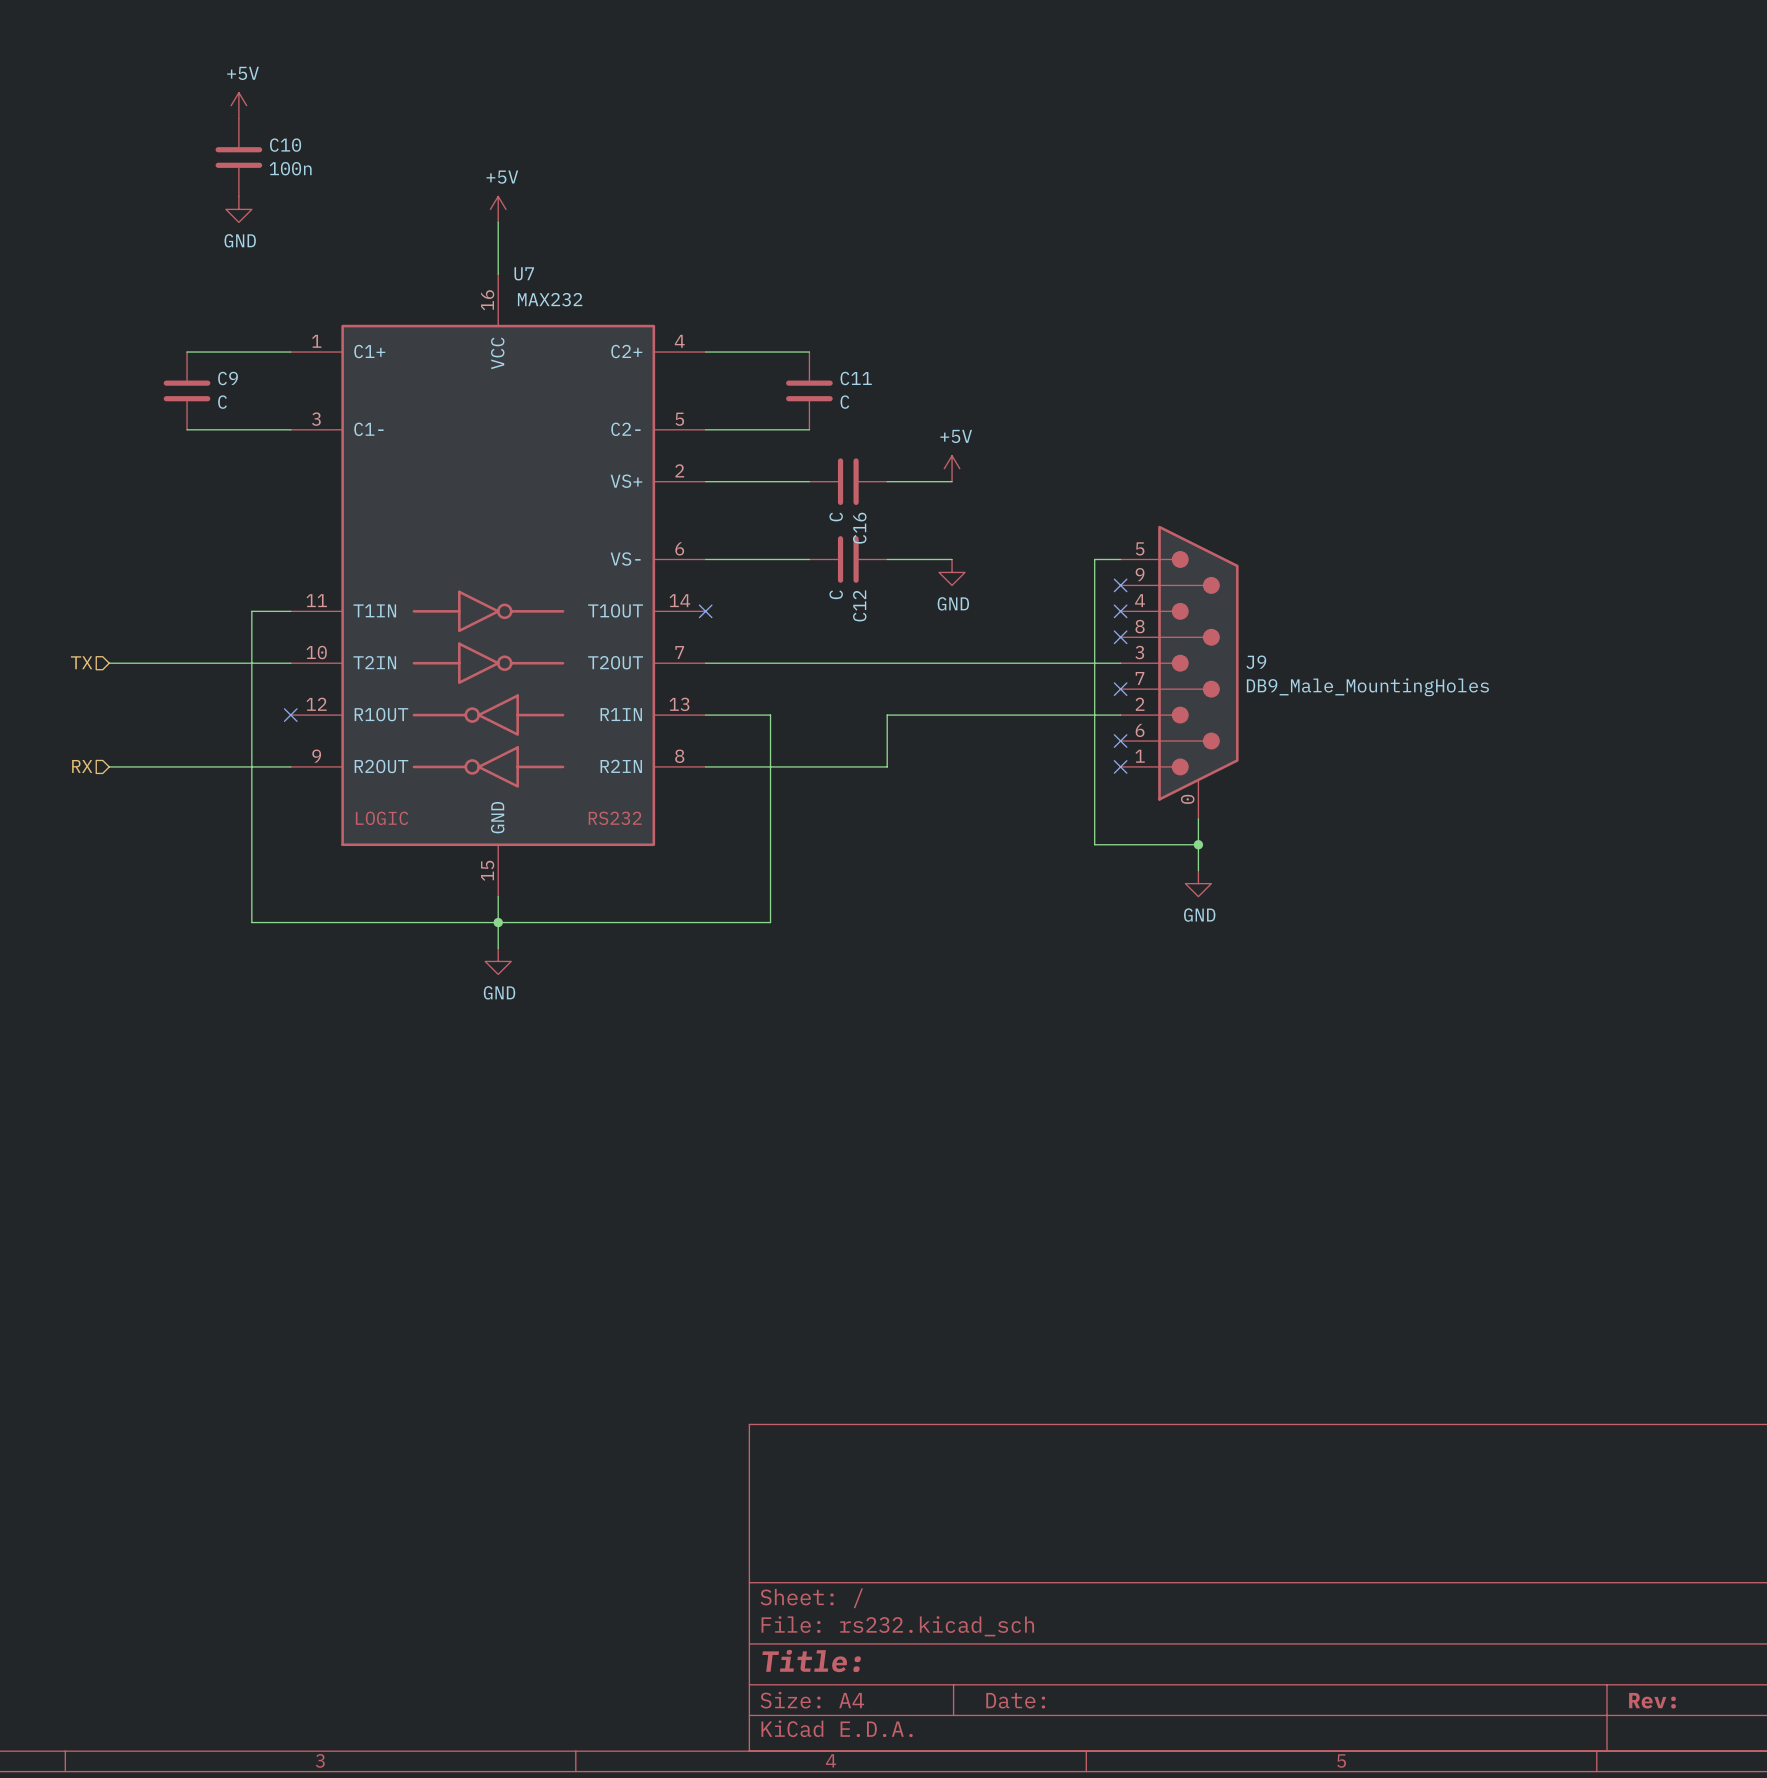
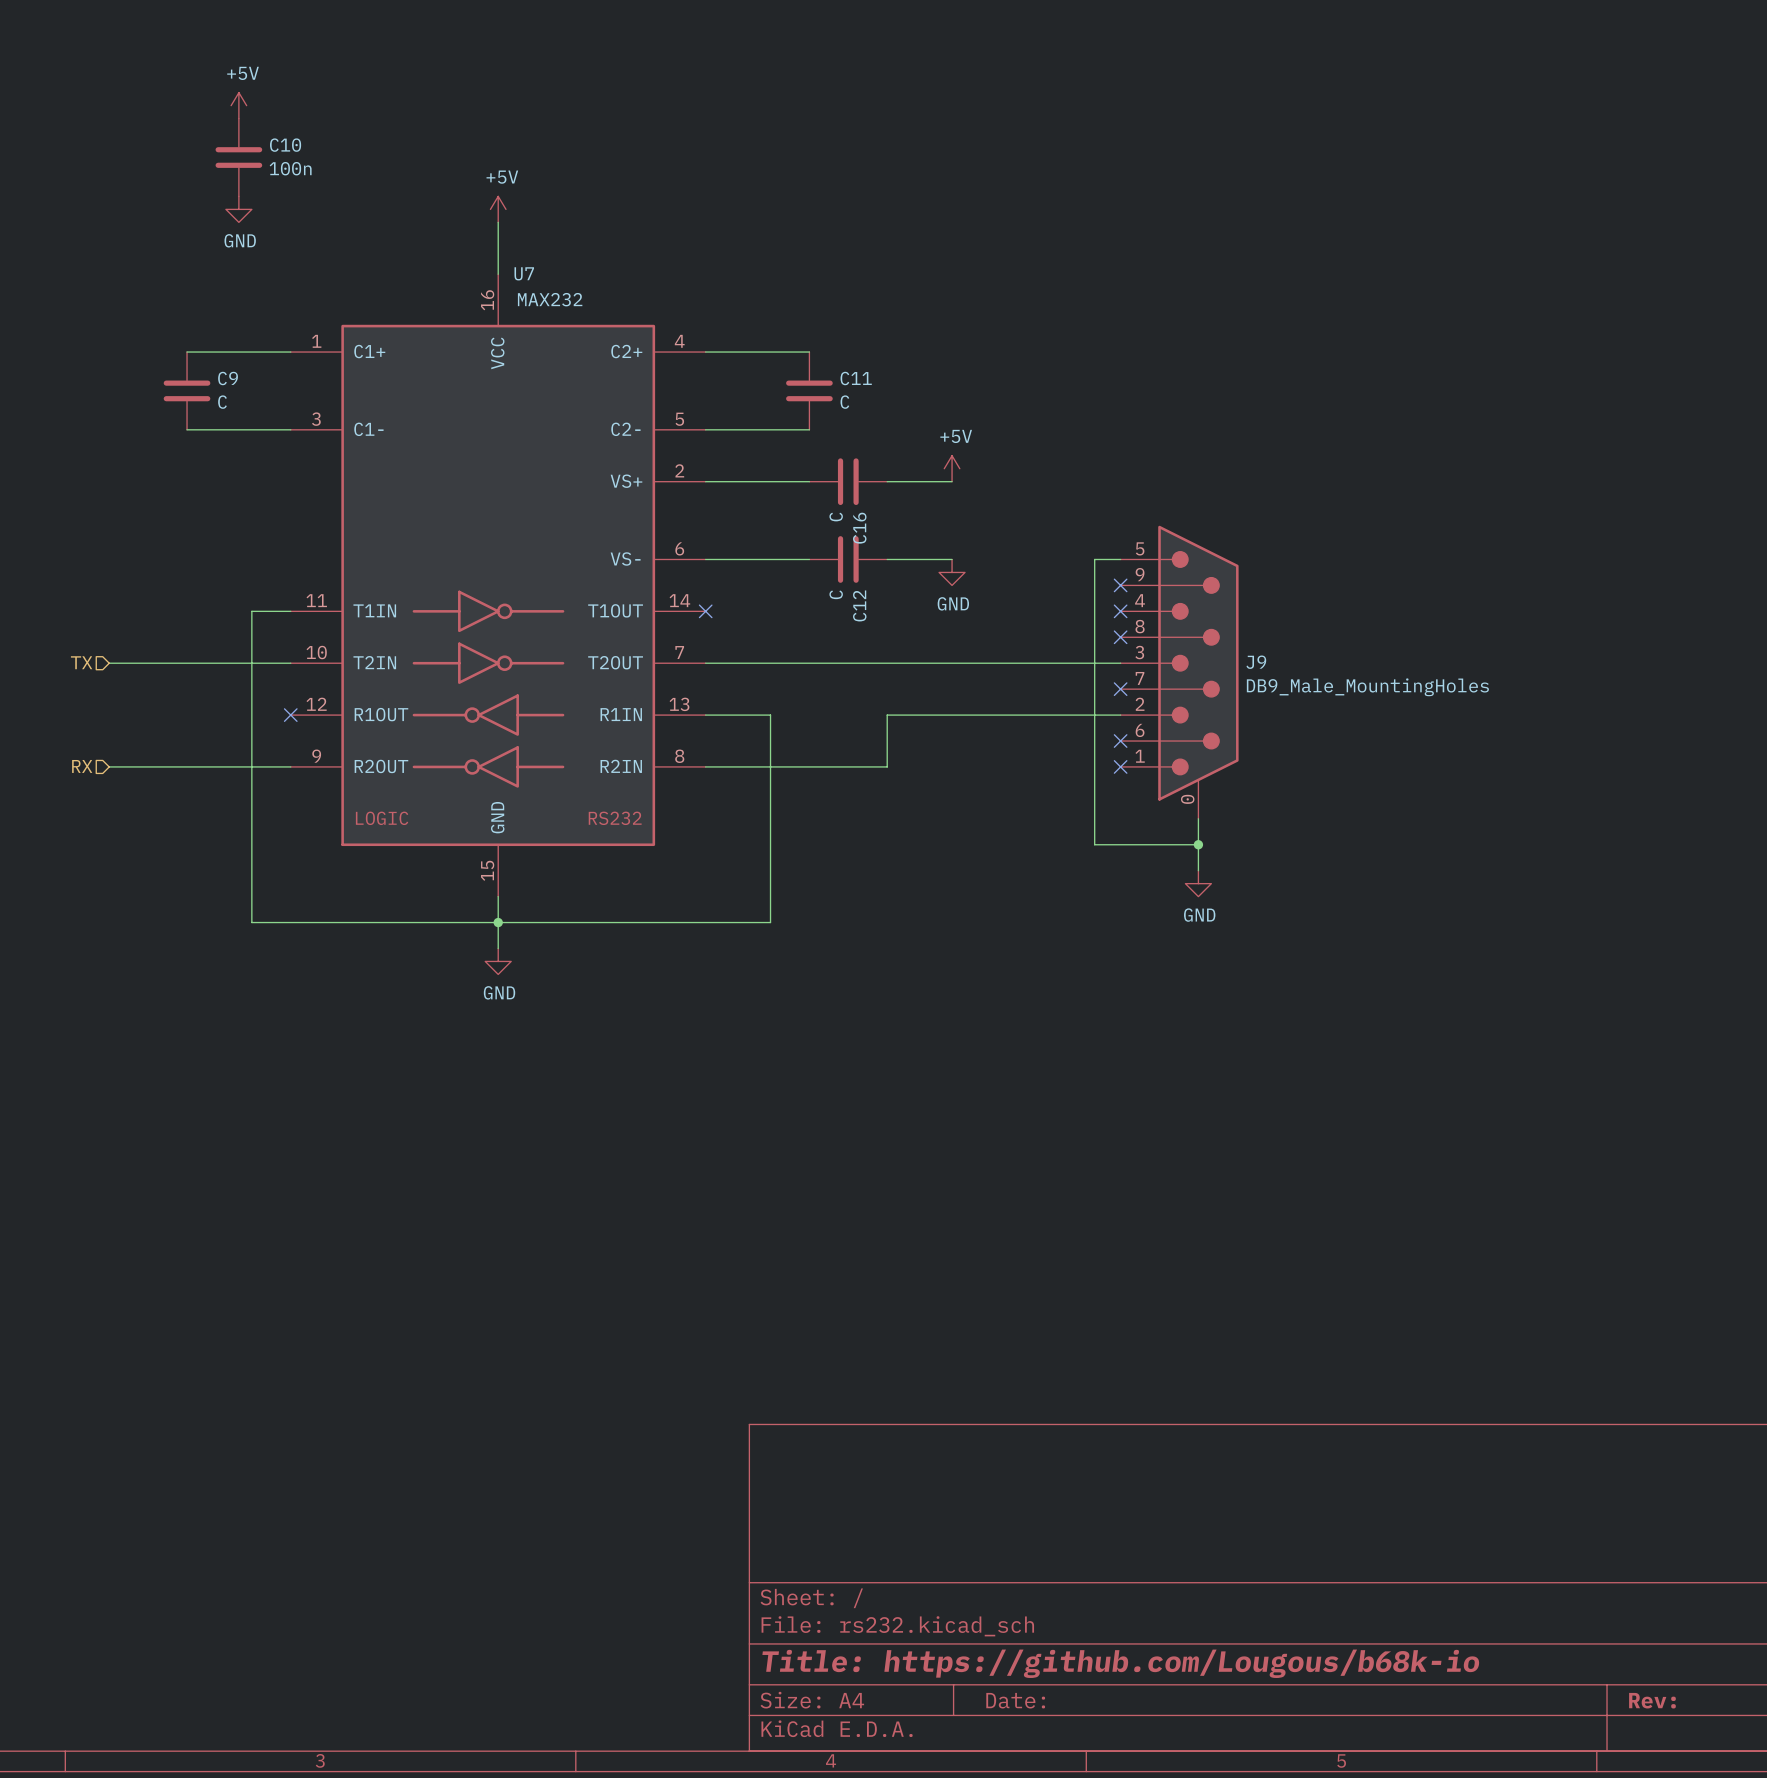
title block: Title: (811, 1660) -> Title: https://github.com/Lougous/b68k-io (1120, 1663)

